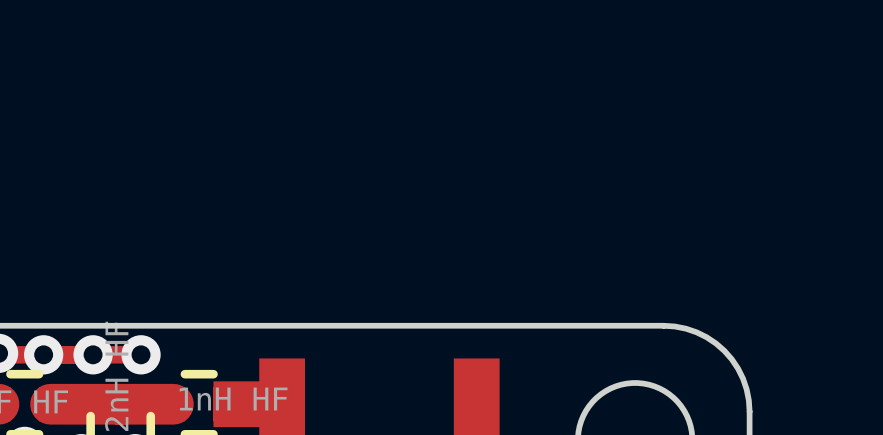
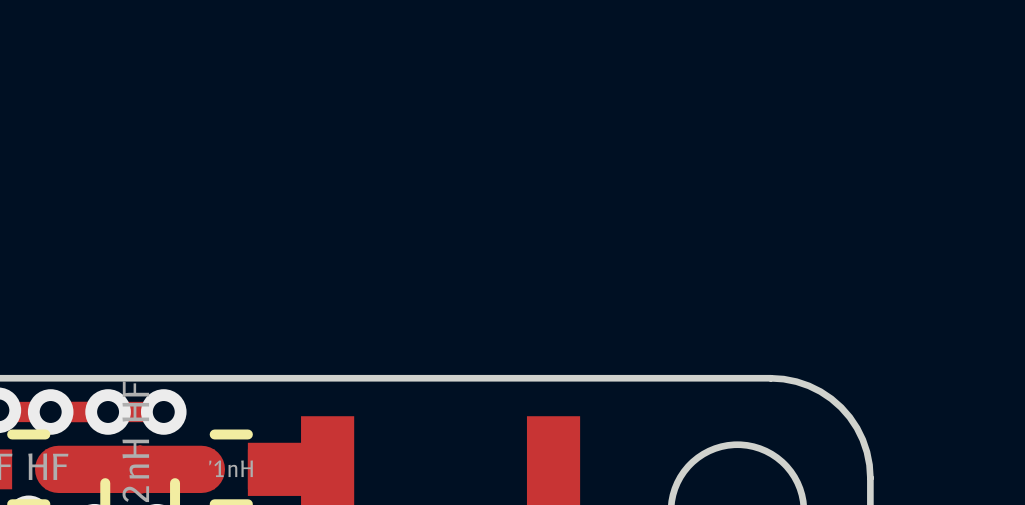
part value: 1nH HF (233, 399) -> '1nH (231, 468)

